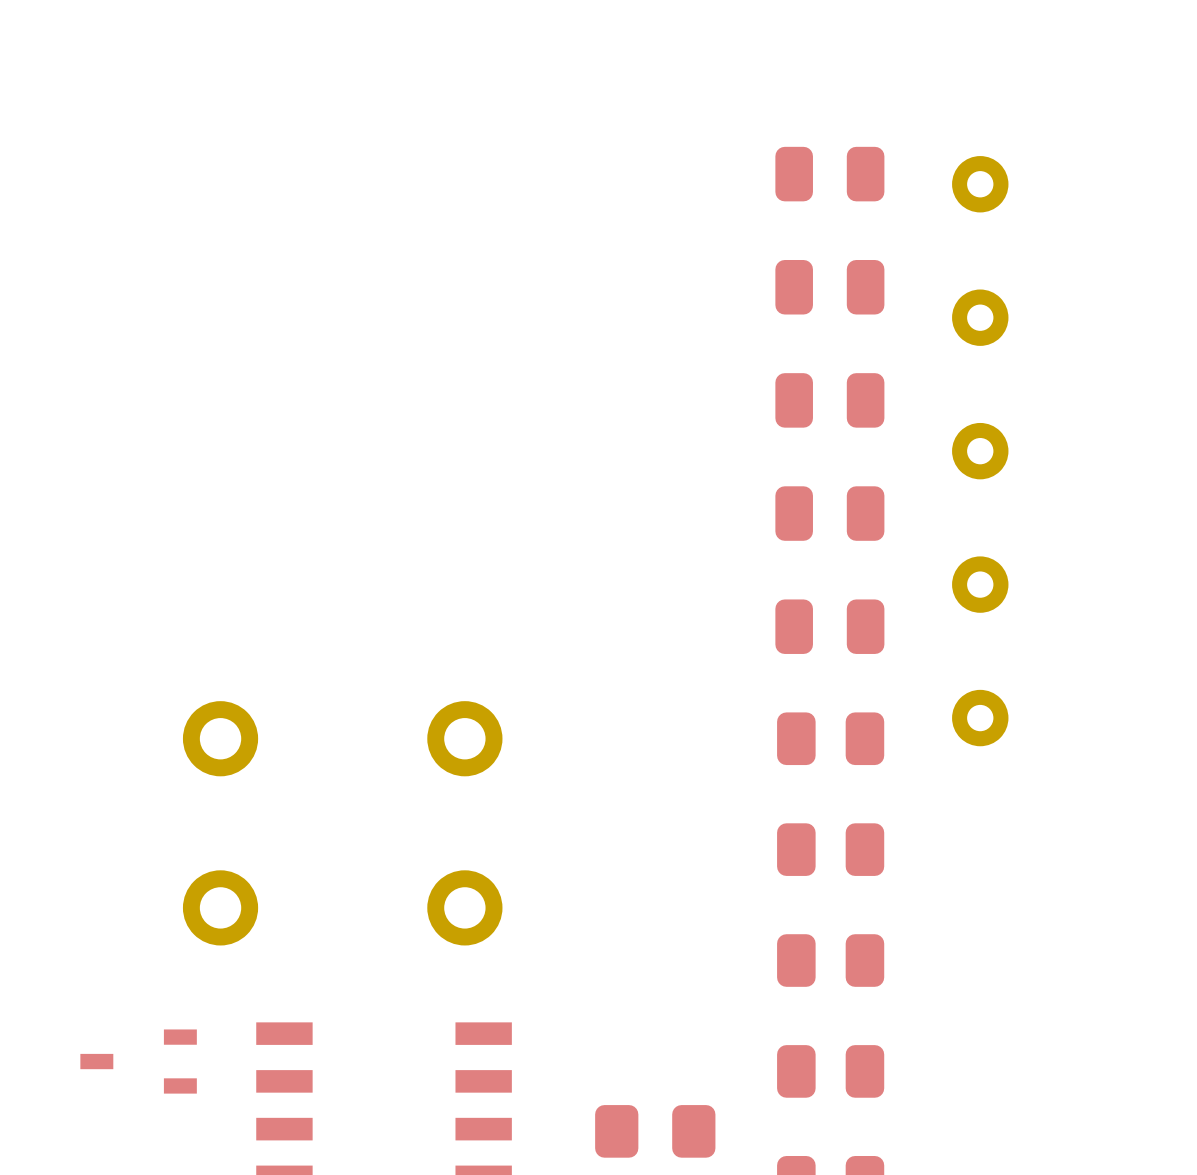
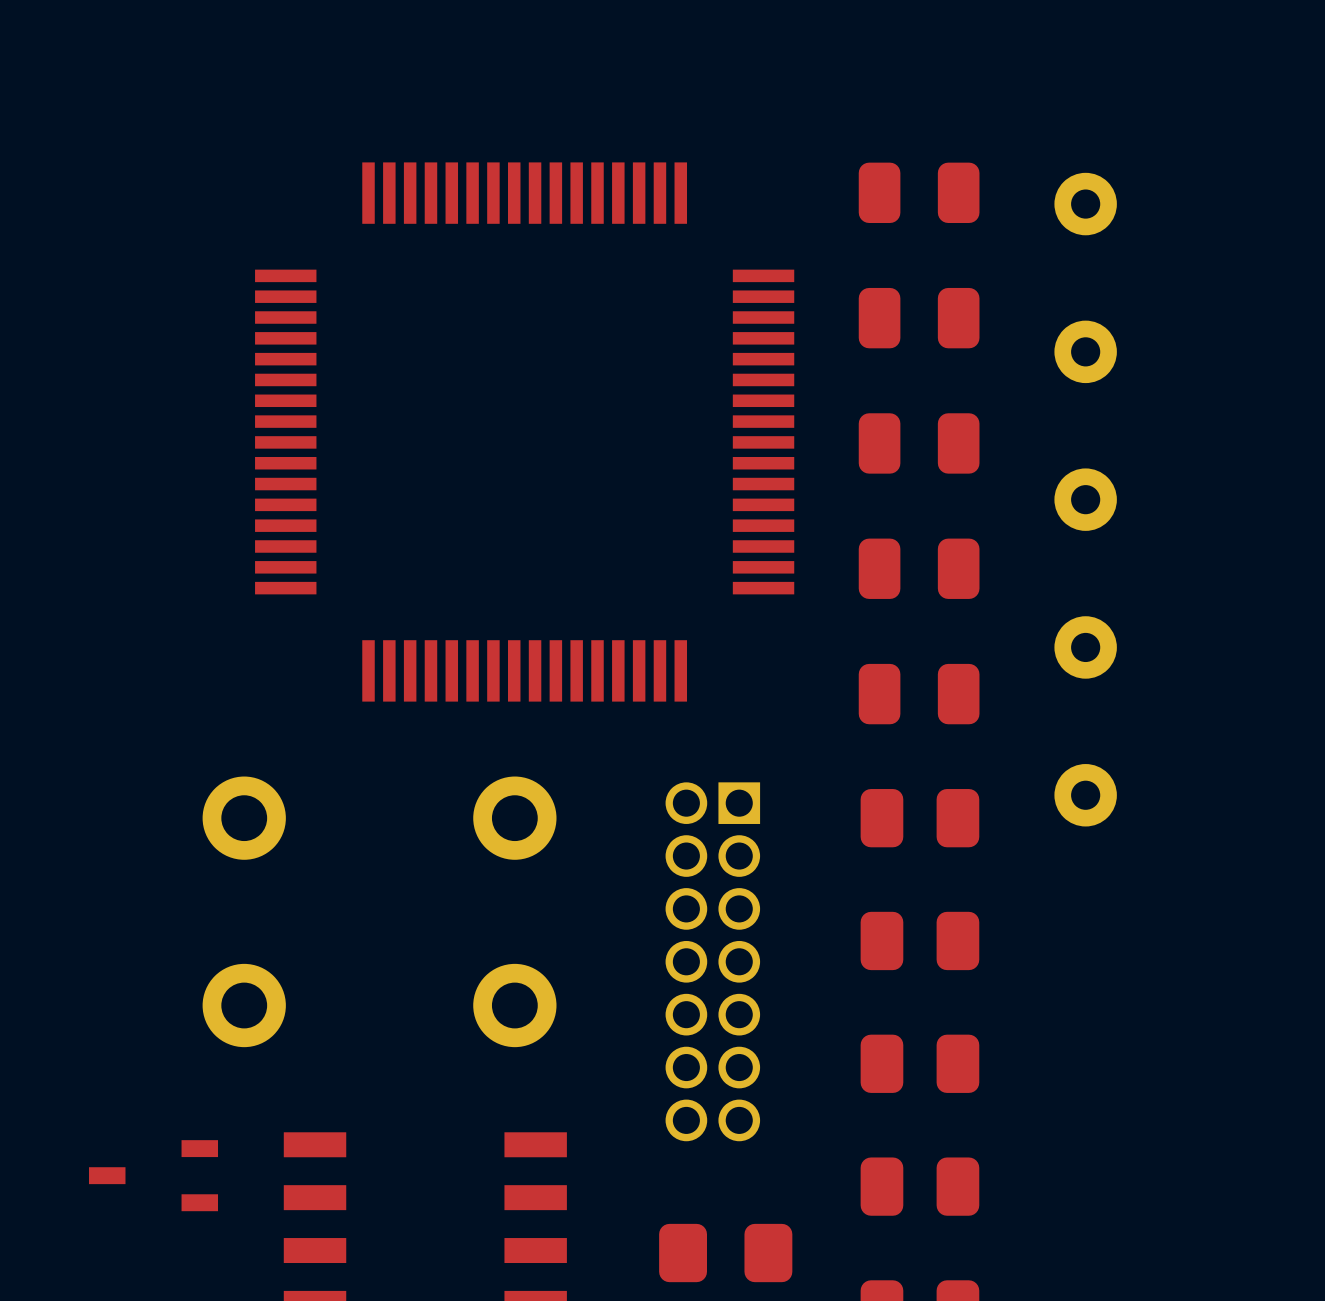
part: none -> (524, 432)
part: none -> (712, 961)

